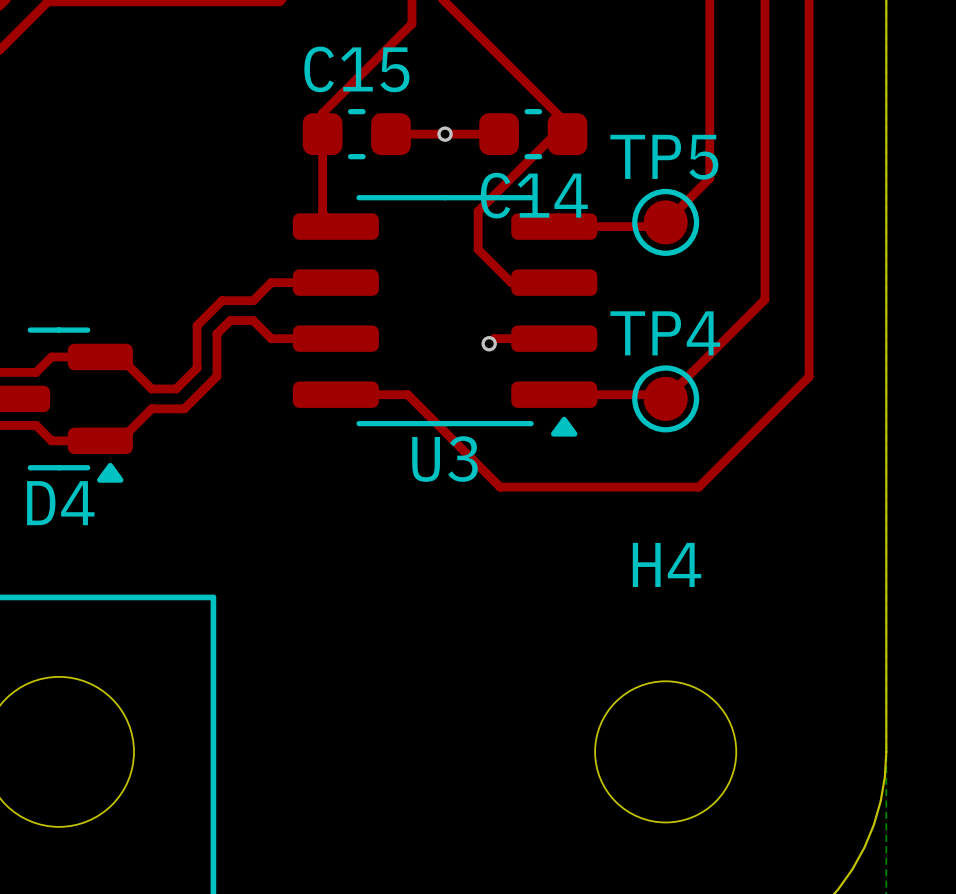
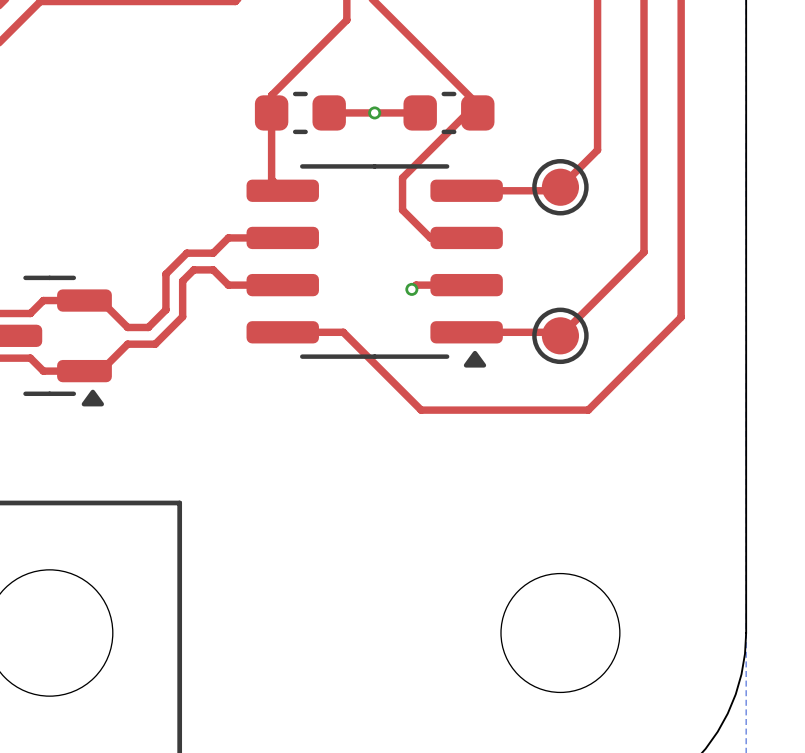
C15 name: C15 (356, 69) -> none
TP5 name: TP5 (664, 157) -> none
C14 name: C14 (534, 195) -> none
TP4 name: TP4 (665, 333) -> none
U3 name: U3 (445, 459) -> none
D4 name: D4 (60, 503) -> none
H4 name: H4 (667, 564) -> none

